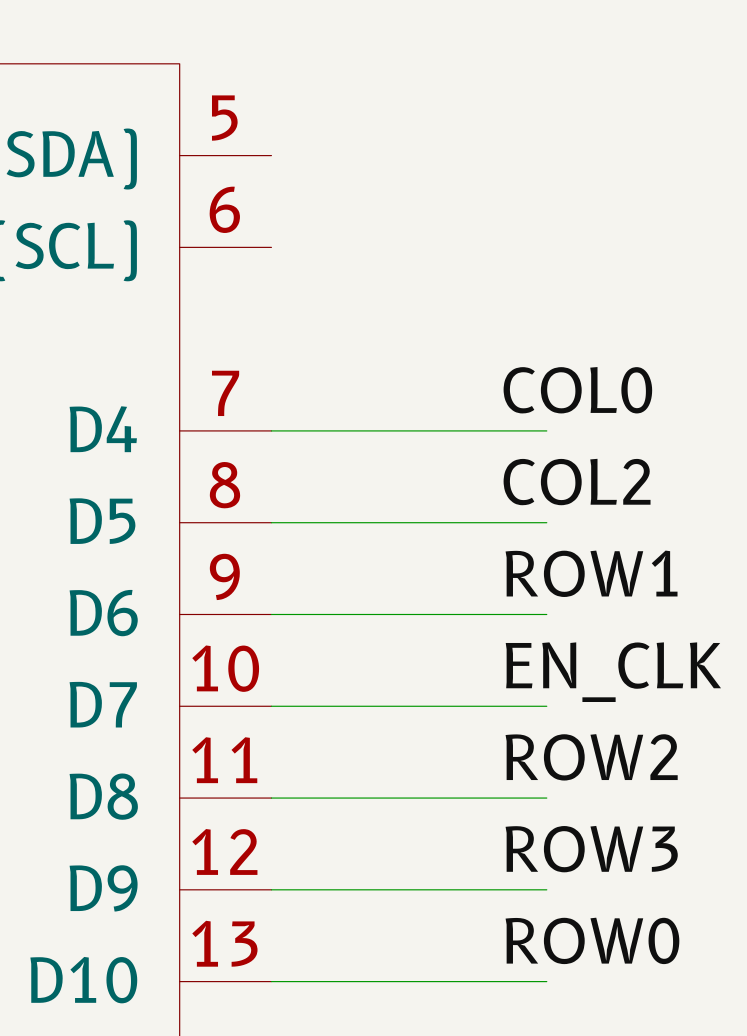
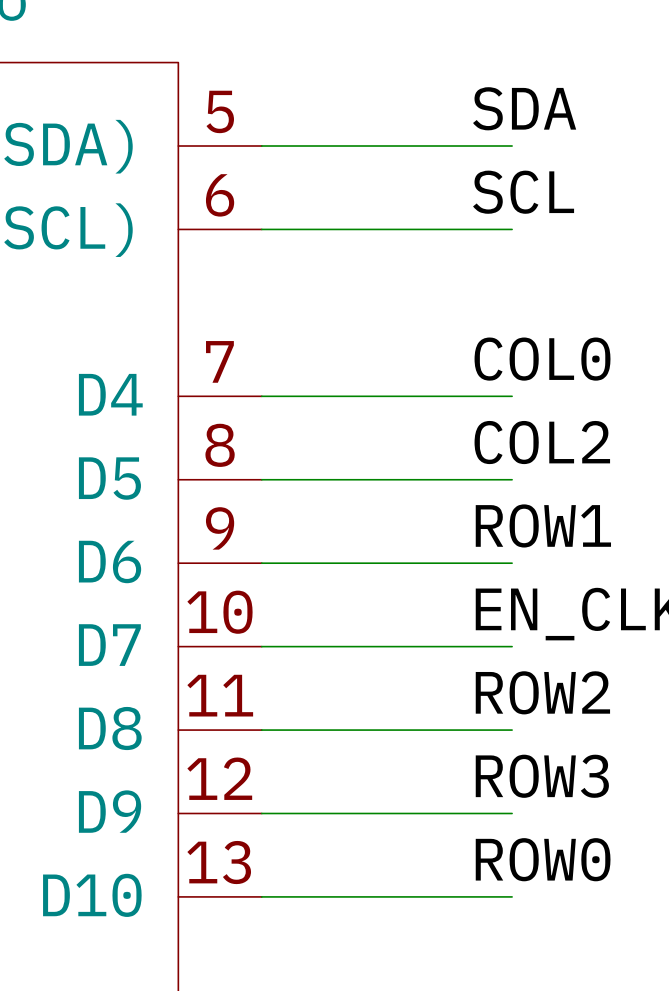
label: none -> SDA (524, 108)
wire: none -> (261, 146) (512, 146)
label: none -> SCL (523, 192)
wire: none -> (261, 229) (512, 229)

